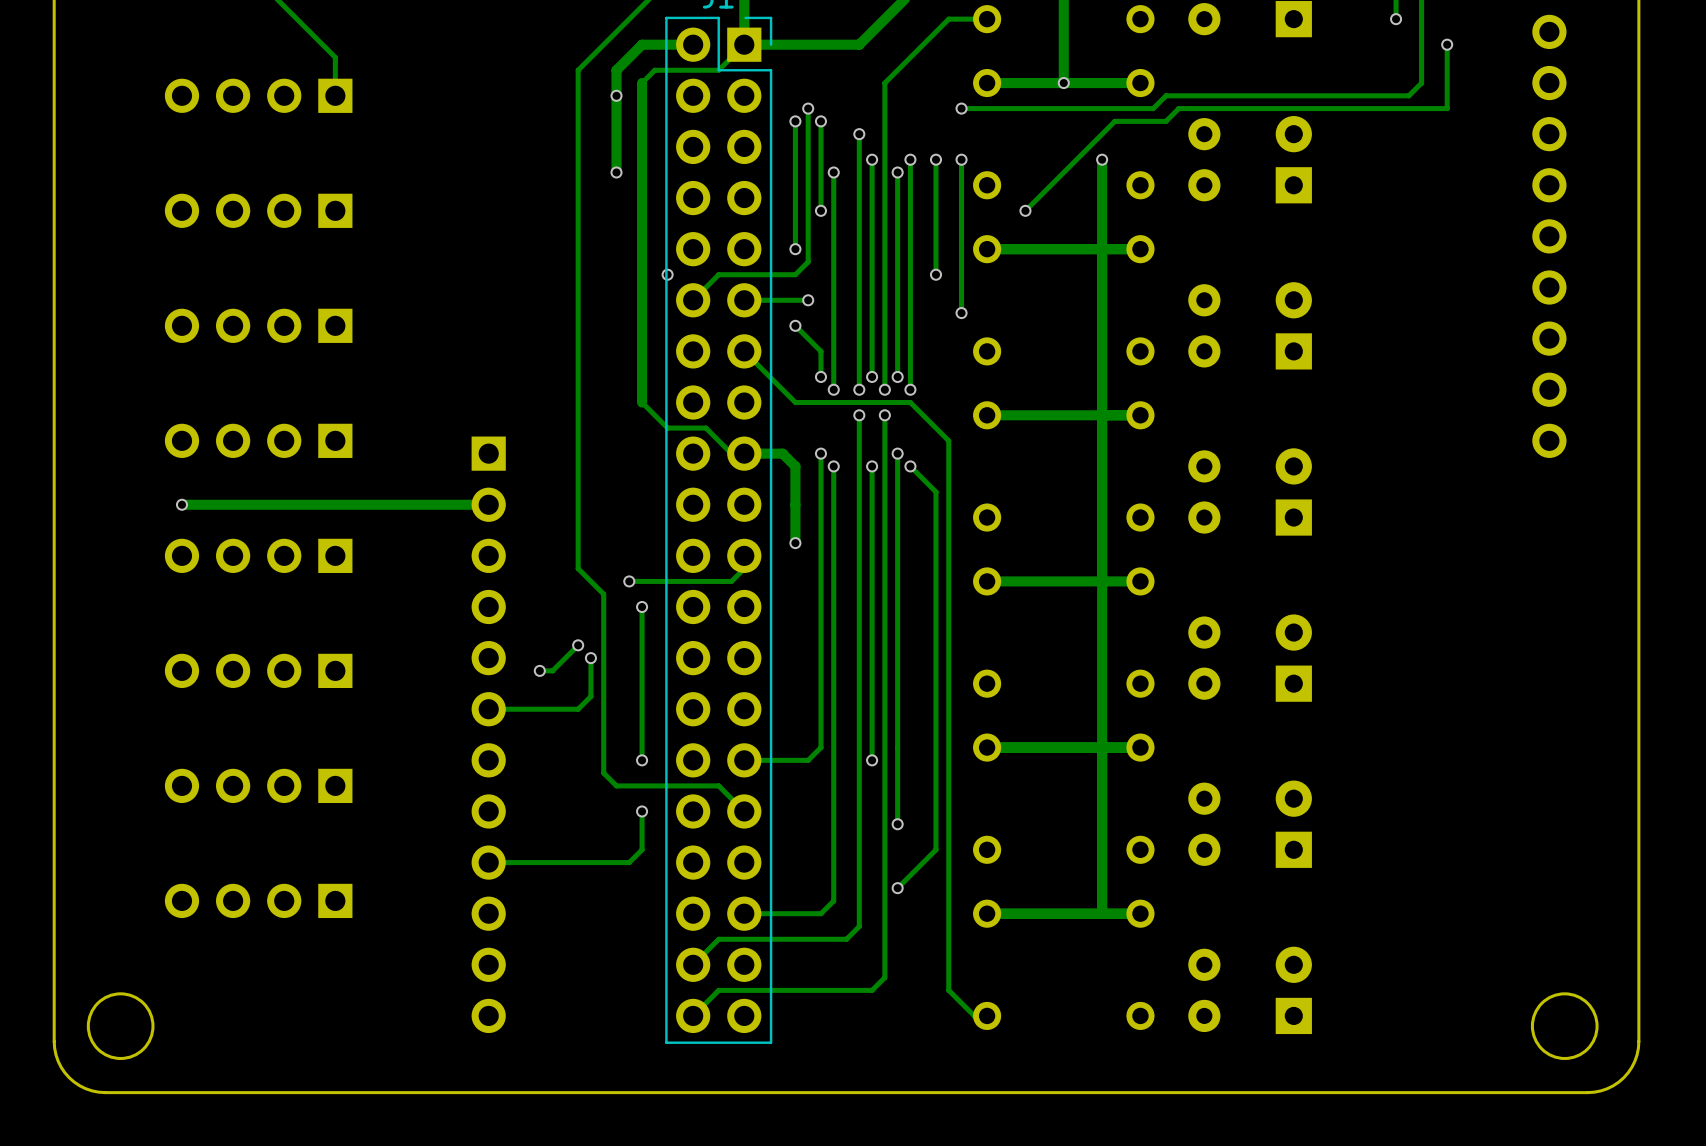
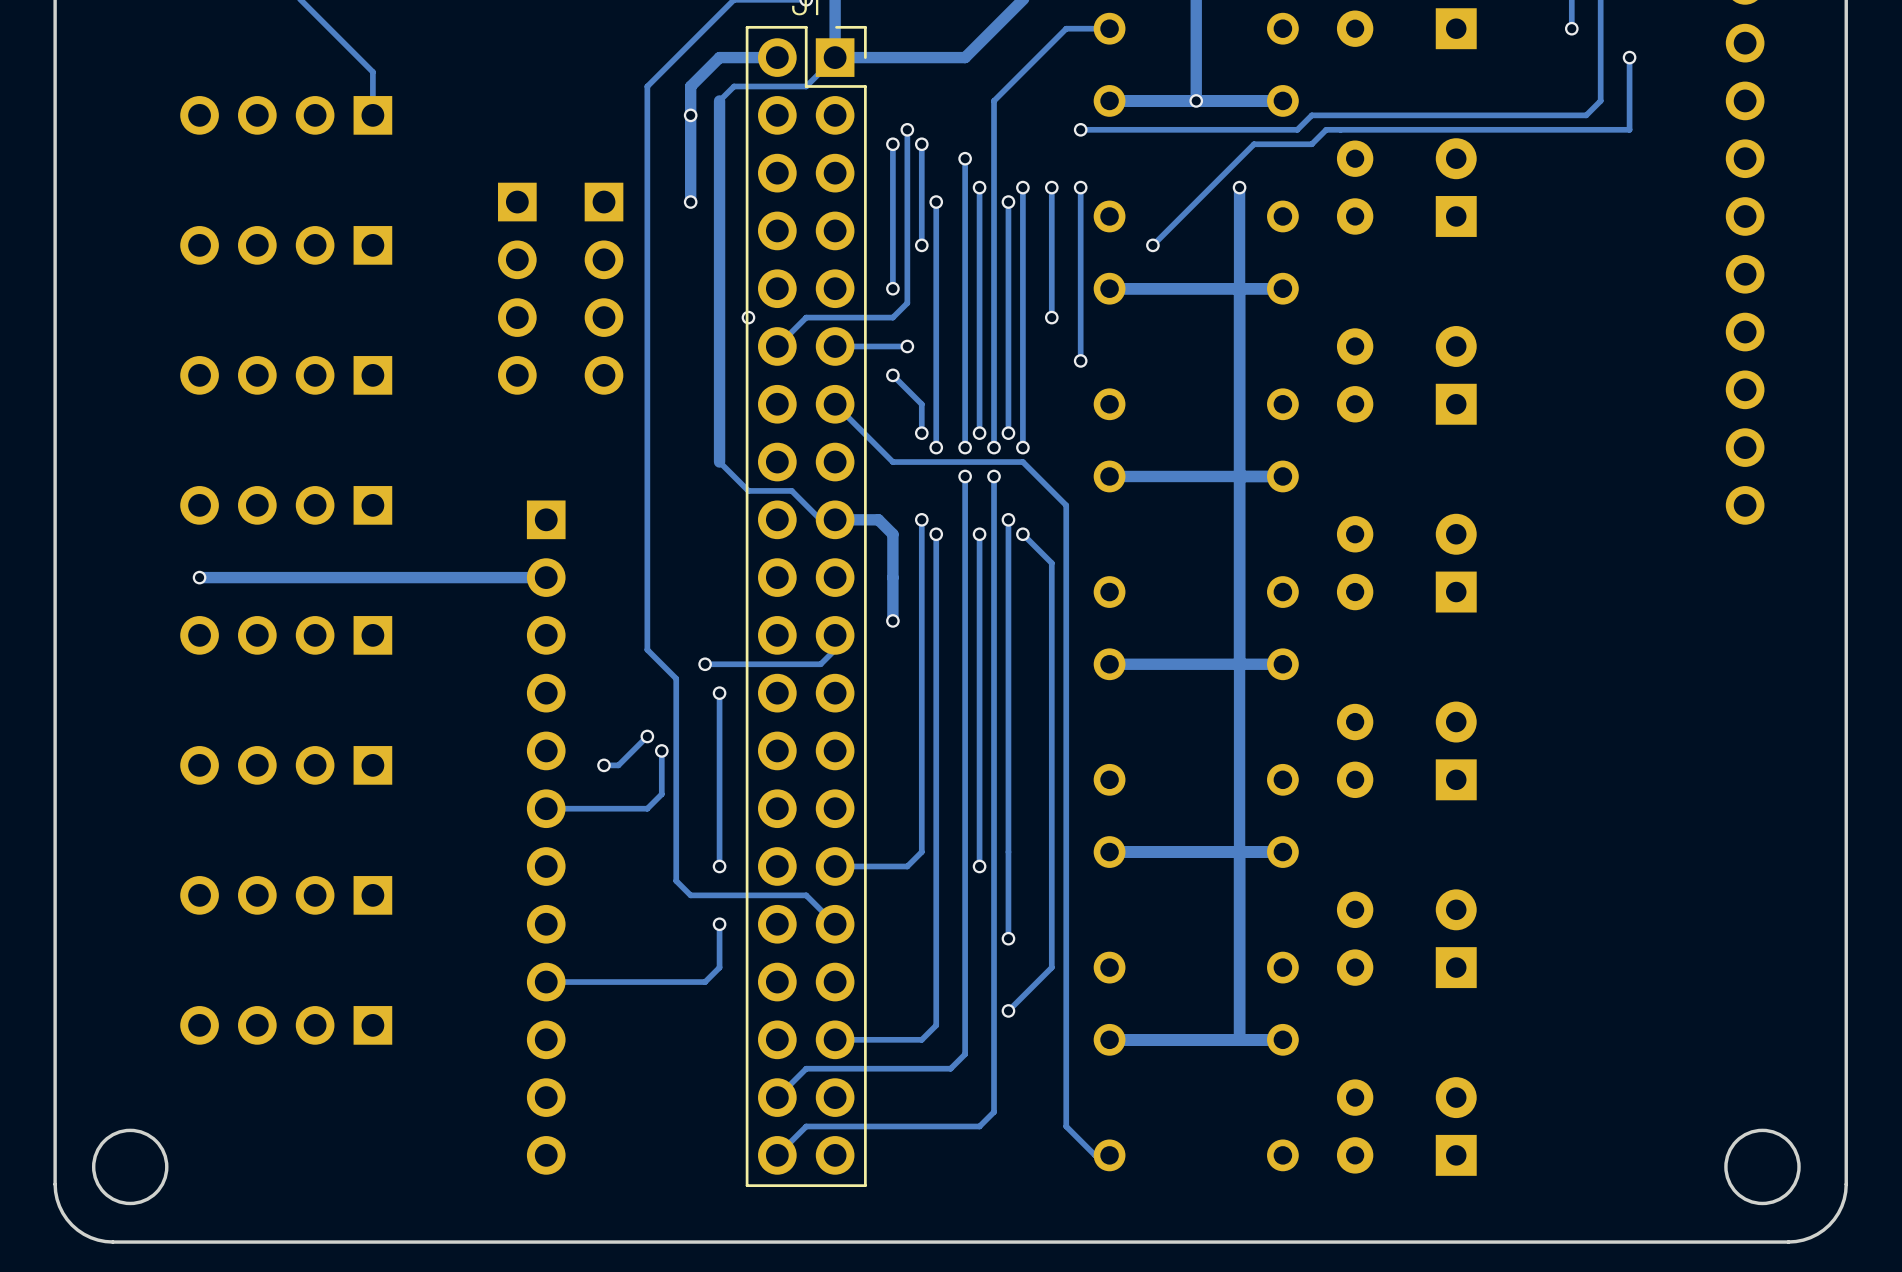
part: none -> (517, 288)
part: none -> (604, 288)

